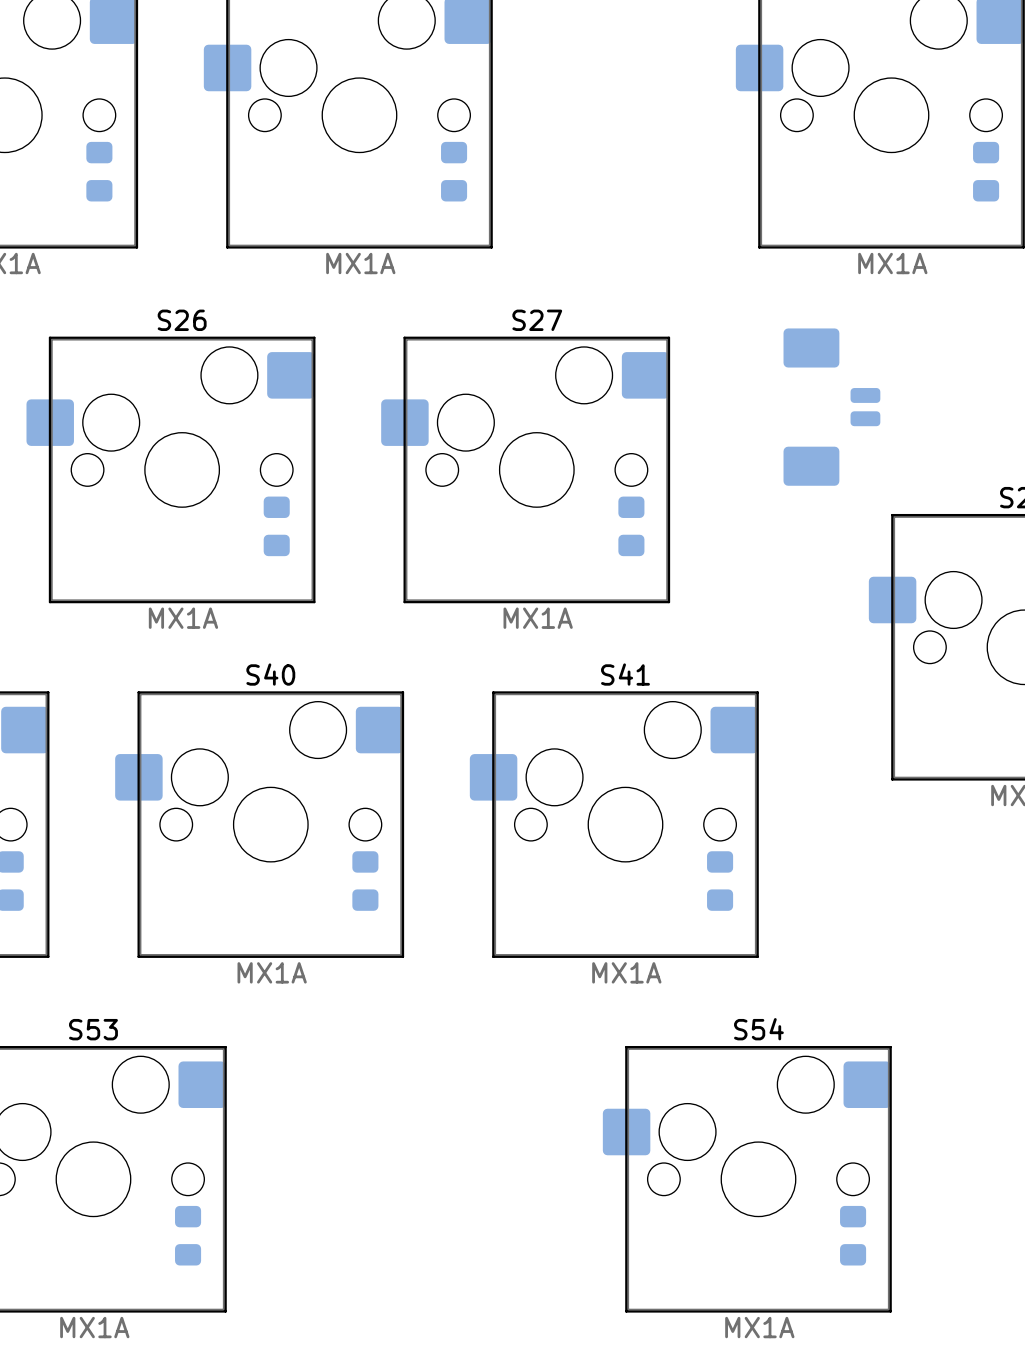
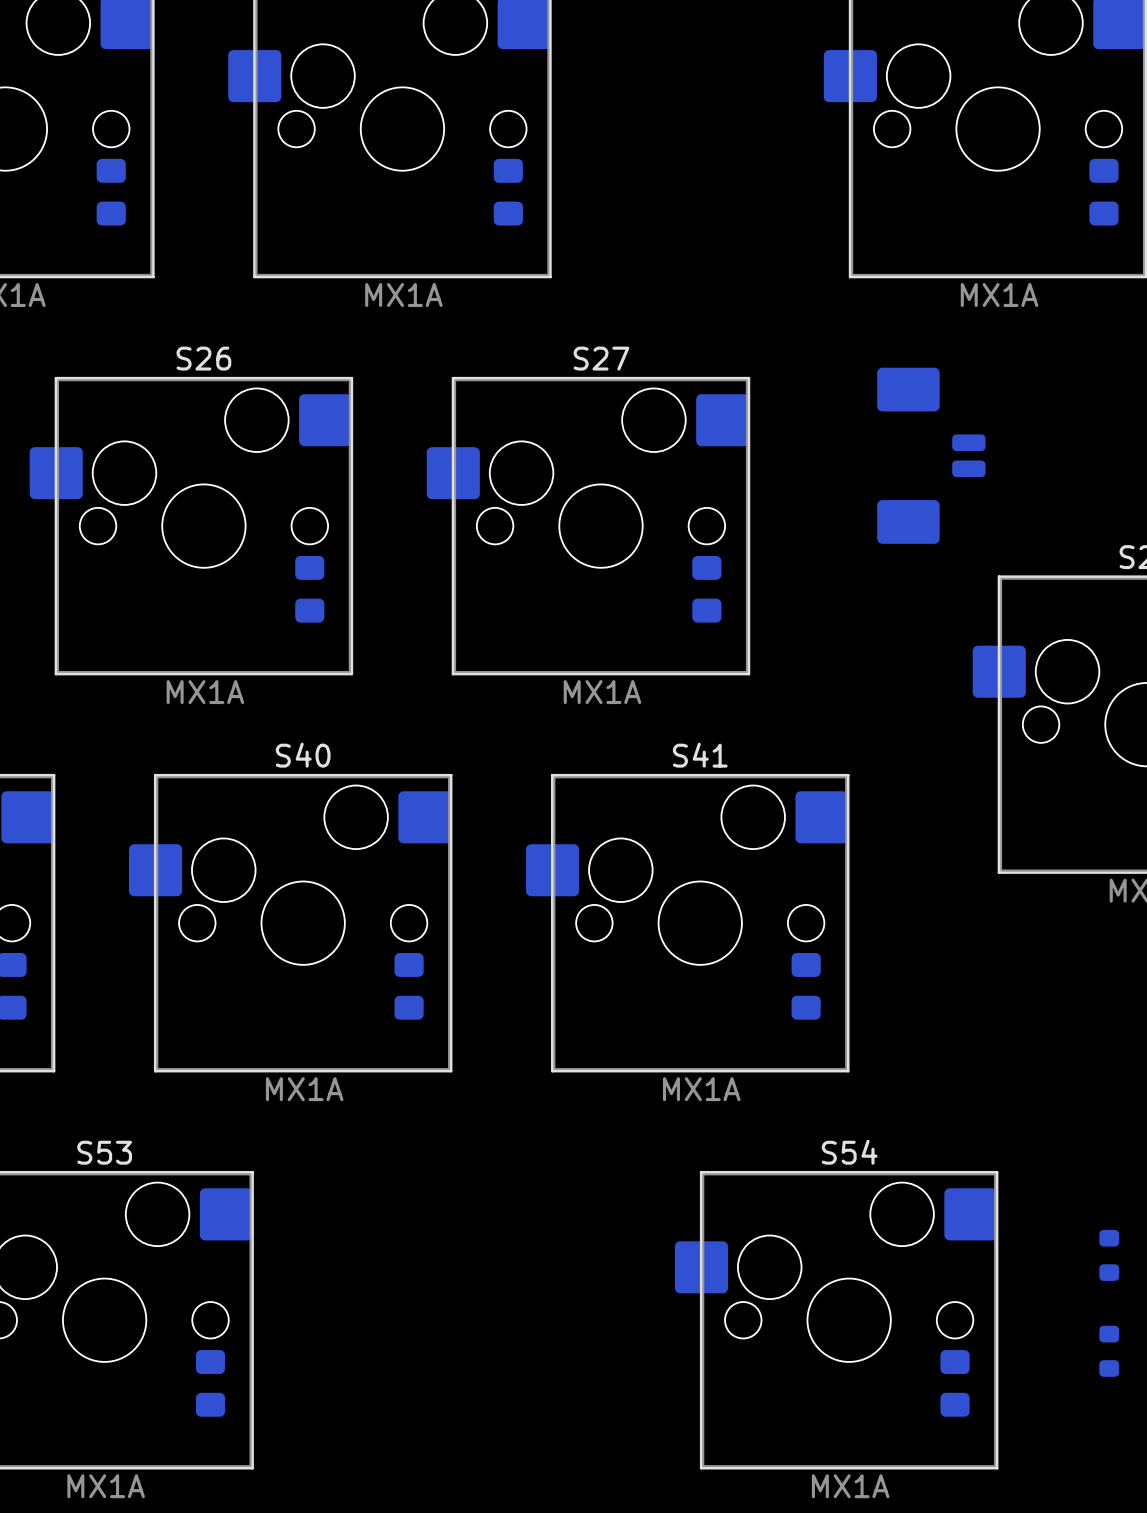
part: none -> (1109, 1255)
part: none -> (1109, 1351)

